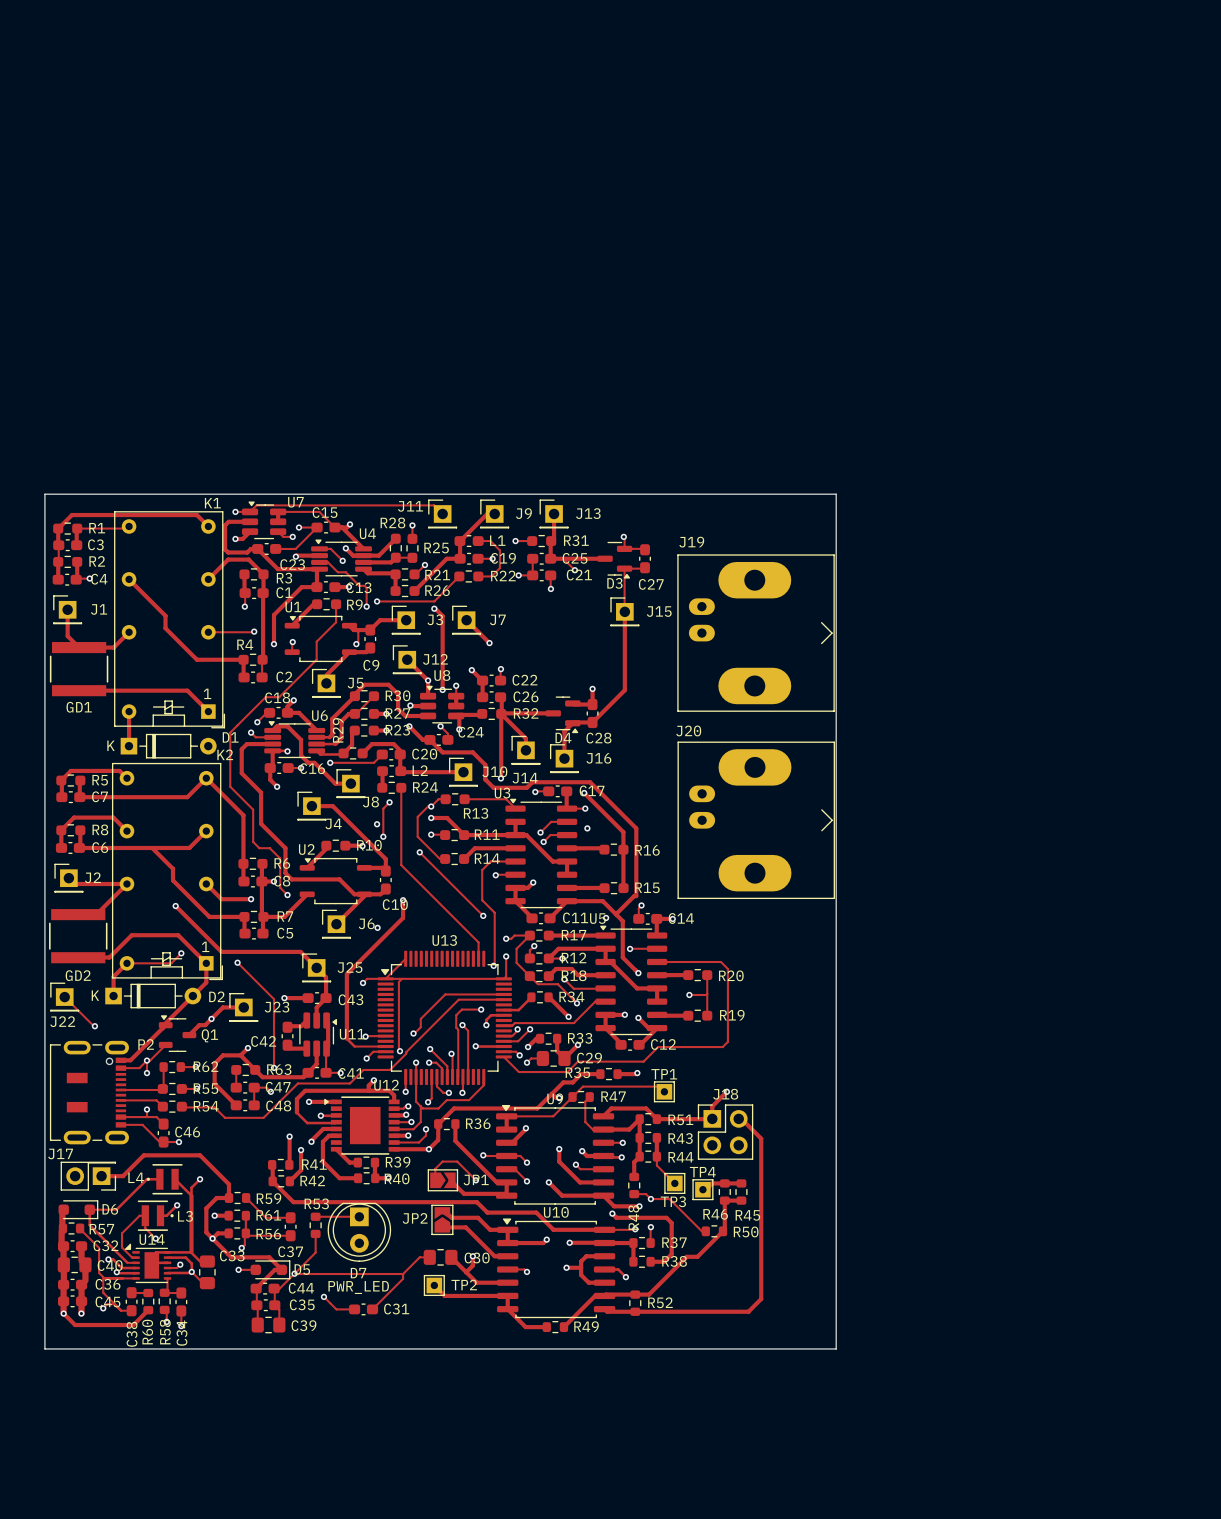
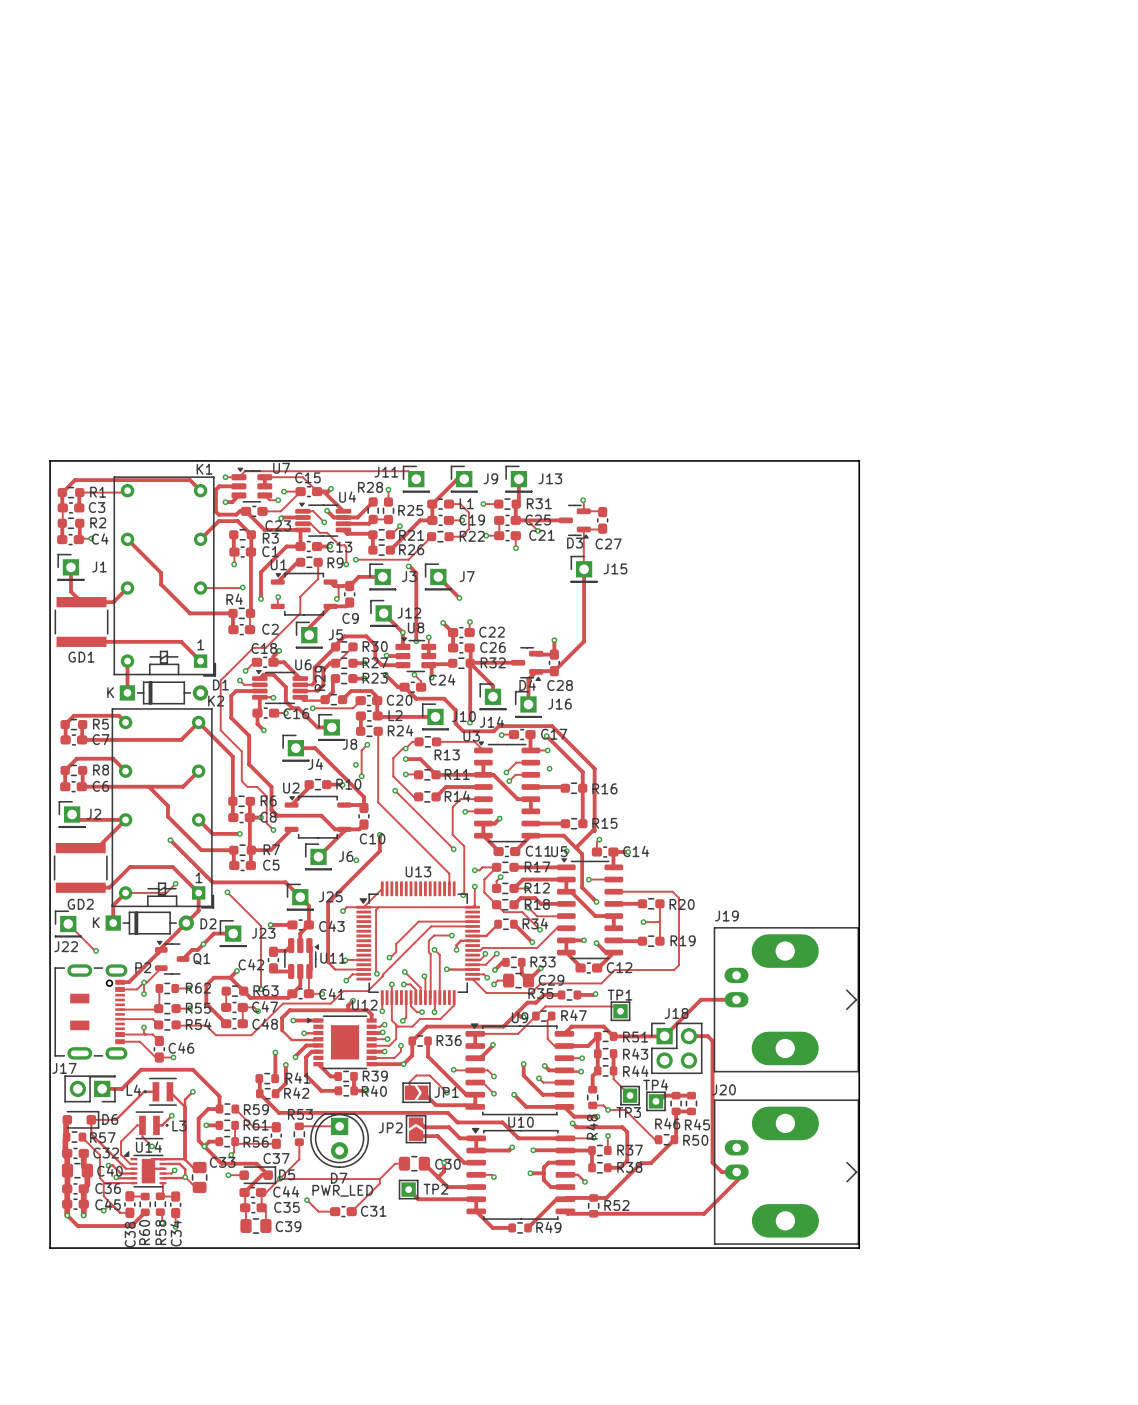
board edge: (836, 494) (836, 1348) -> (778, 460) (859, 460) (859, 1248) (778, 1248)
J19 position: (756, 633) -> (786, 999)
J20 position: (756, 820) -> (786, 1172)
track: (726, 1091) (712, 1106) (712, 1118) -> (736, 999) (701, 999) (664, 1036)
via: (726, 1091) -> none
track: (741, 1118) (761, 1138) (761, 1299) (748, 1311) -> (691, 1036) (707, 1036) (712, 1040) (712, 1162) (721, 1172) (736, 1172)
track: none -> (746, 1171) (704, 1213) (697, 1213)

